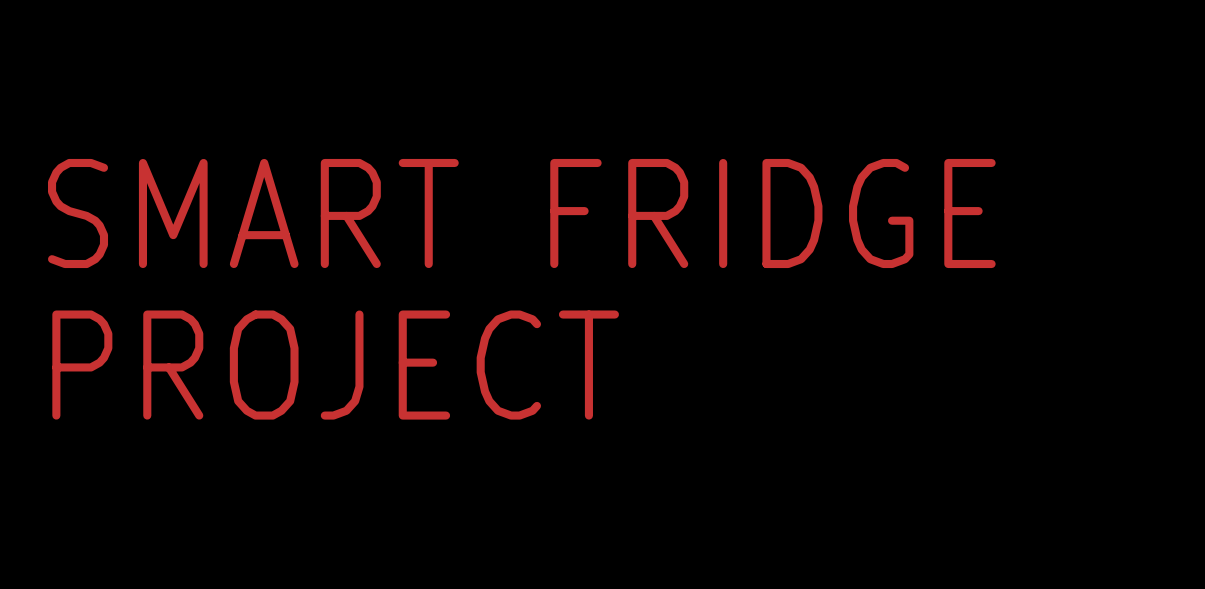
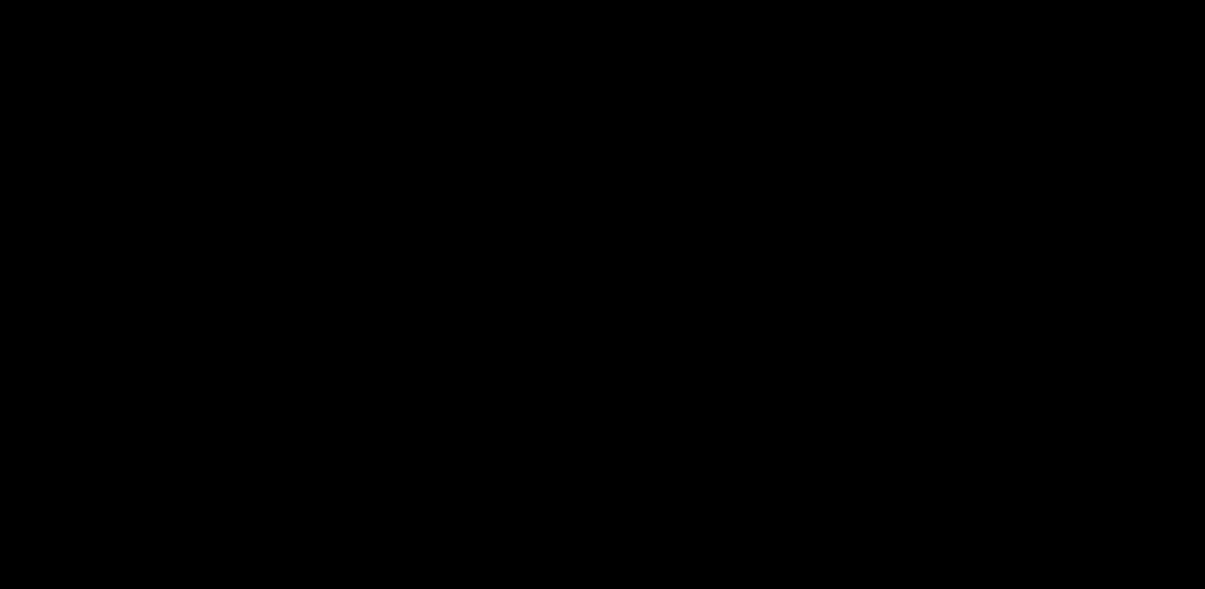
text: SMART FRIDGE (521, 213) -> none
text: PROJECT (335, 365) -> none

